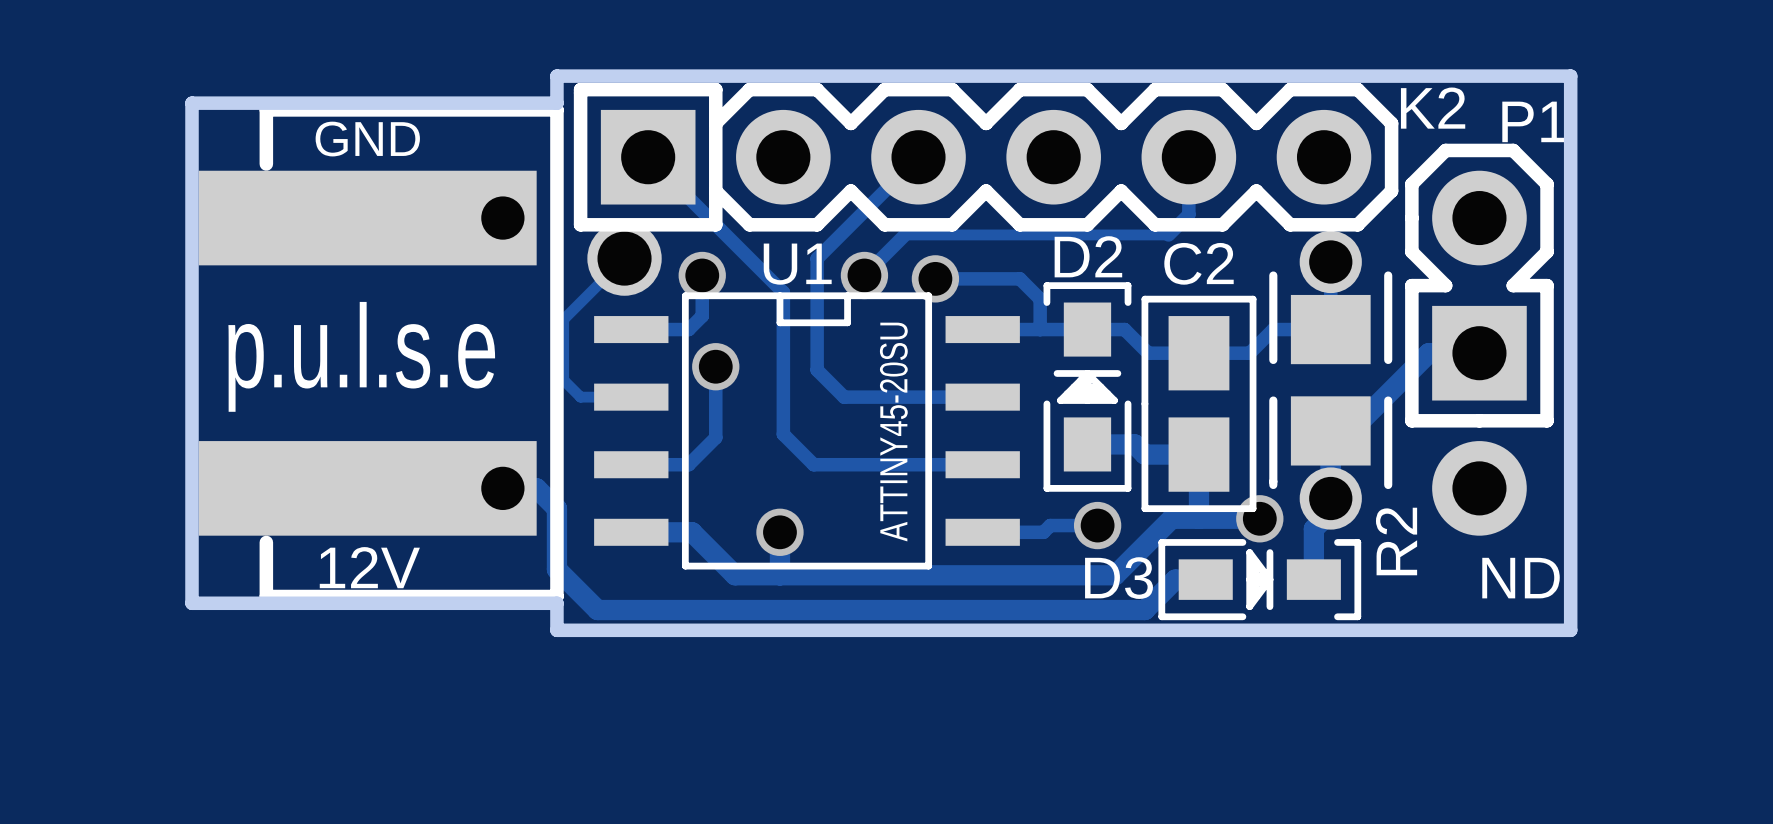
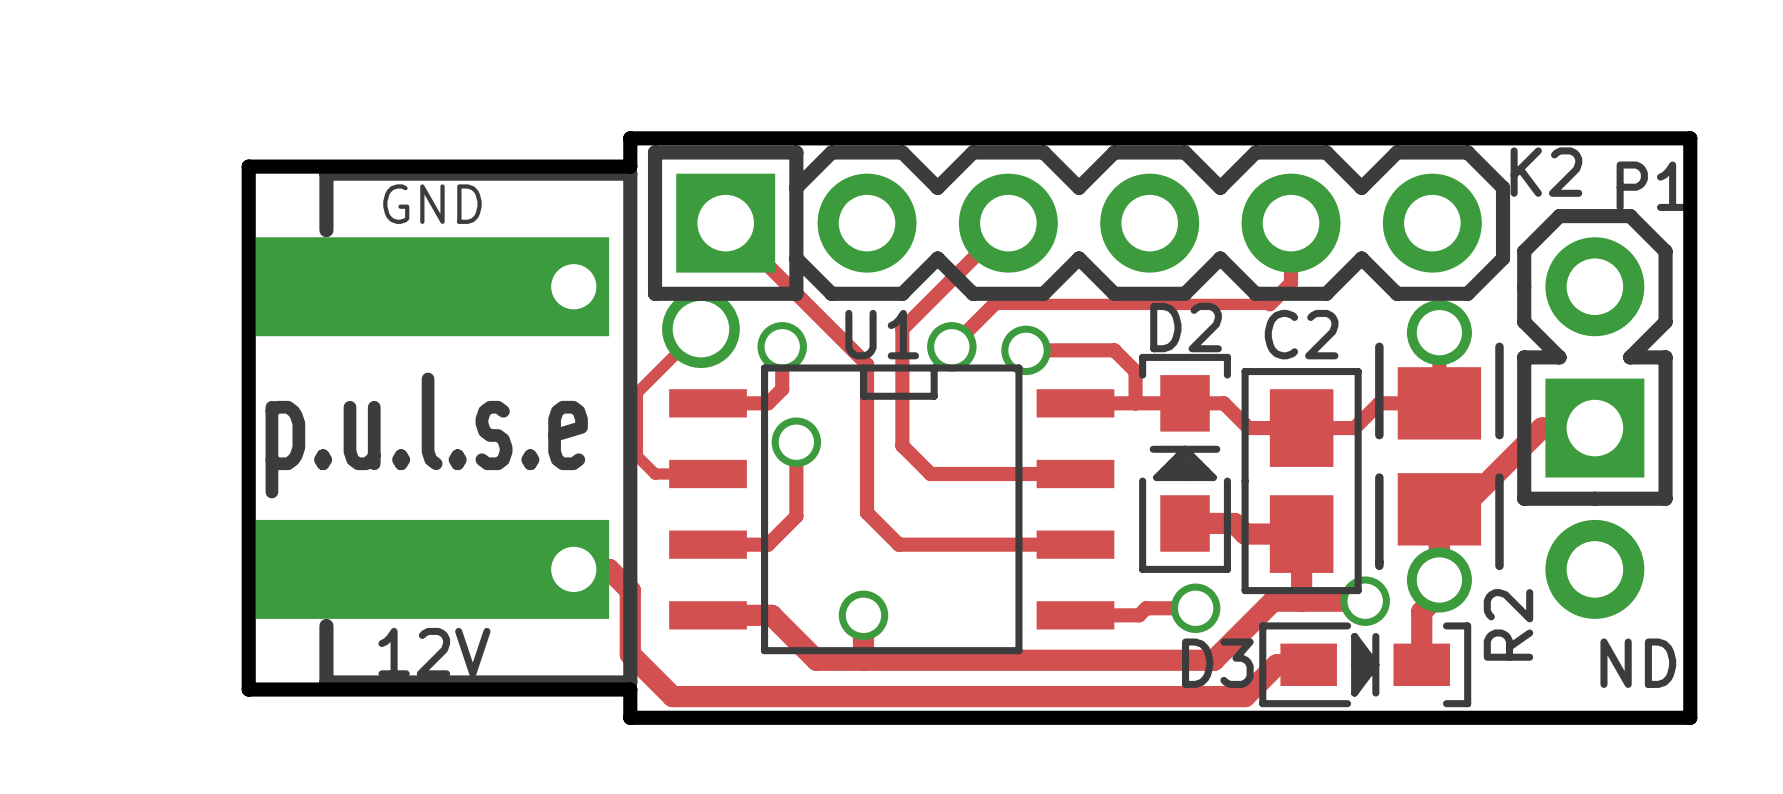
U1 value: ATTINY45-20SU (893, 432) -> none

